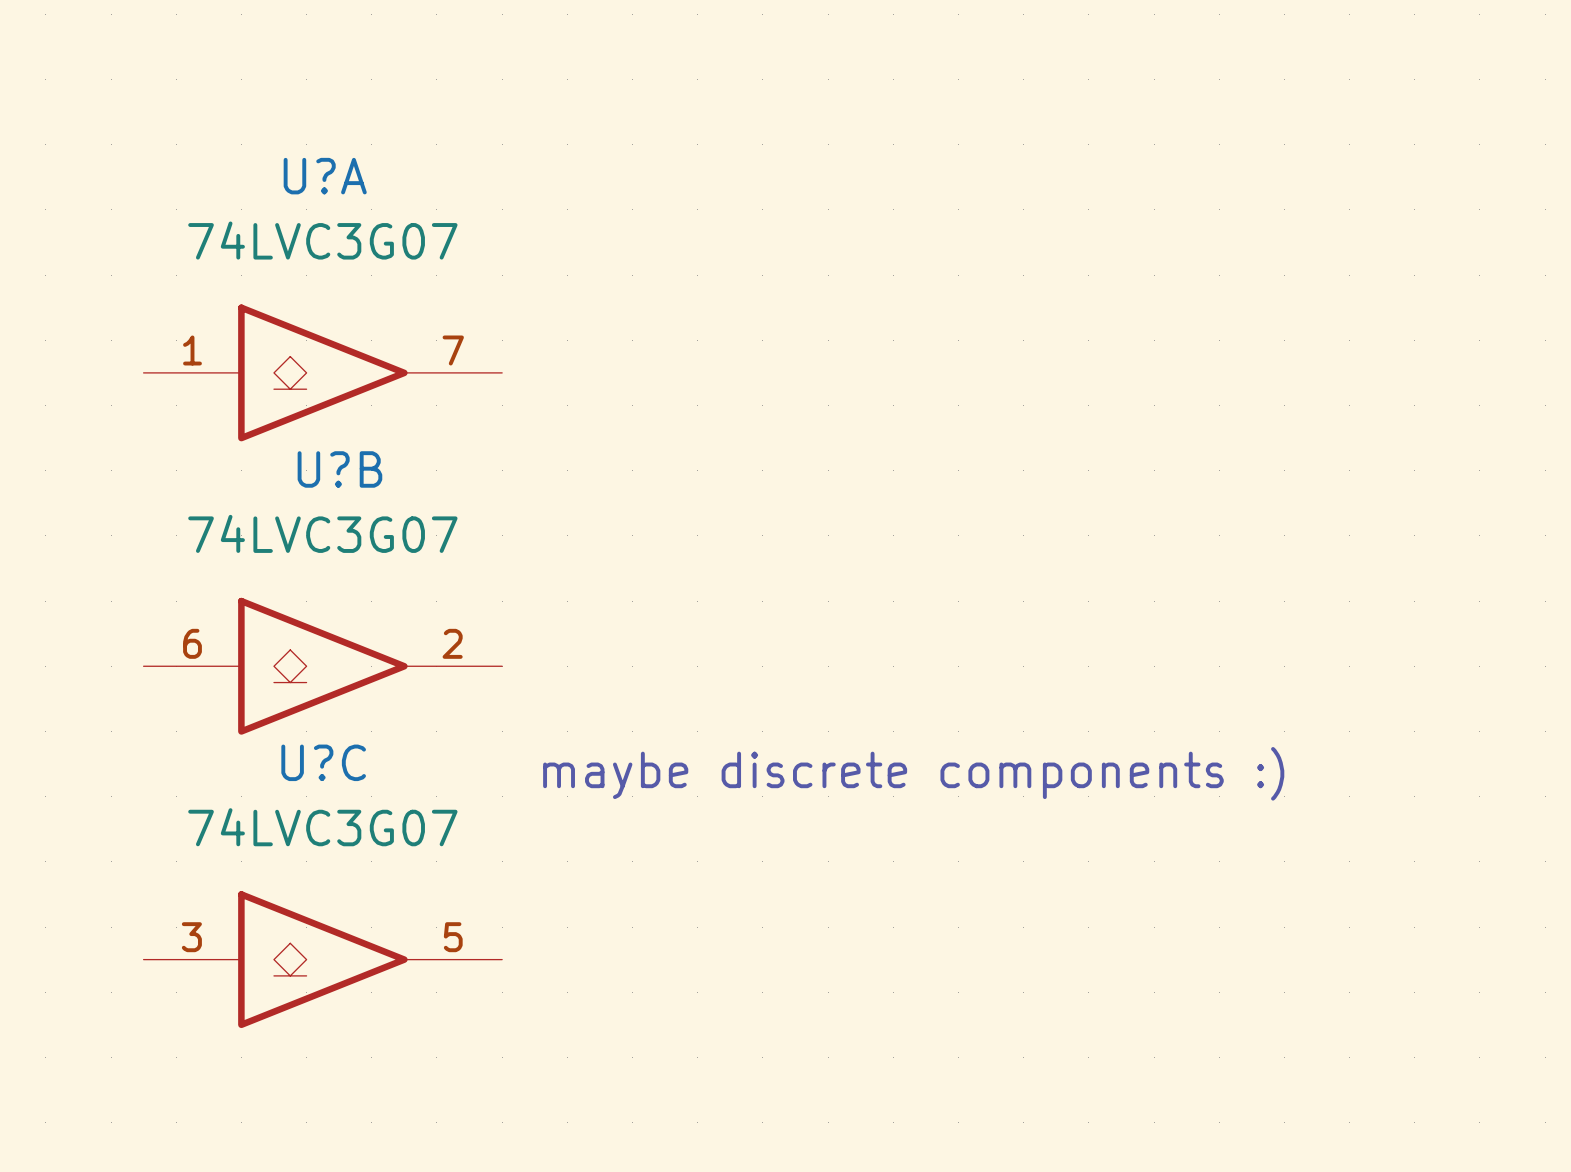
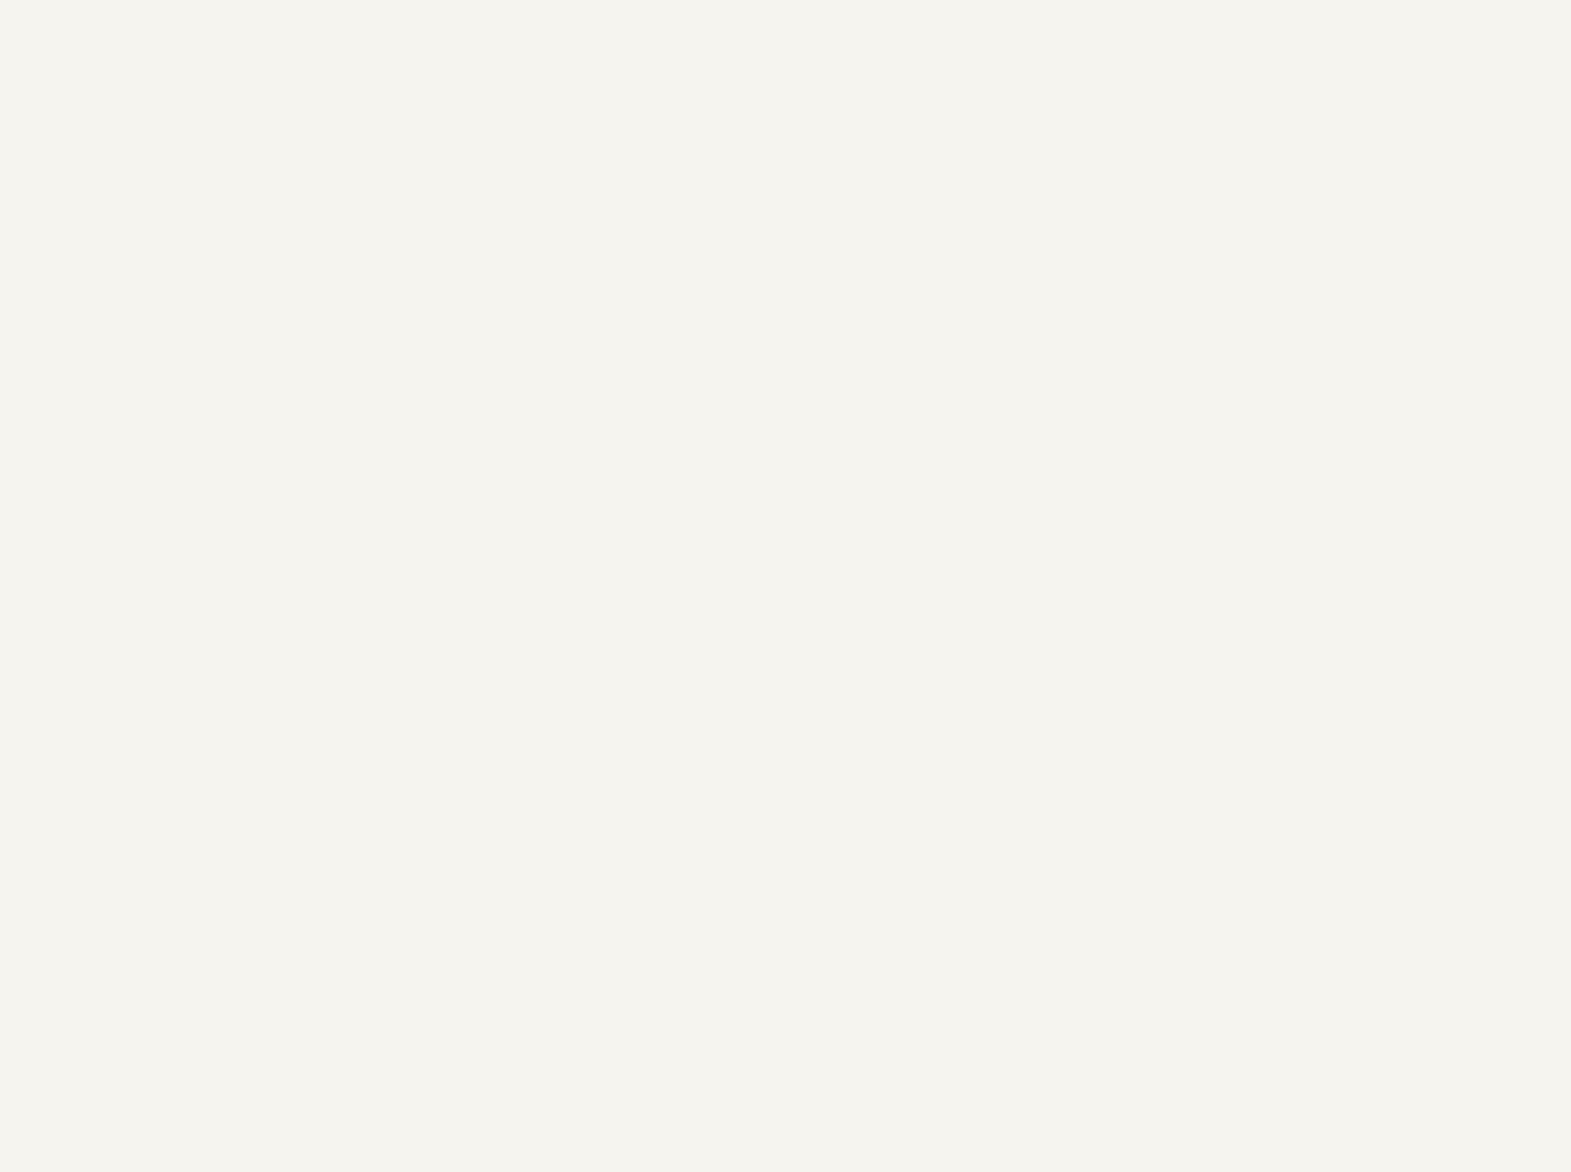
U?A: 74LVC3G07 (322, 372) -> none
U?B: 74LVC3G07 (322, 666) -> none
text: maybe discrete components :) (913, 773) -> none
U?C: 74LVC3G07 (322, 959) -> none

